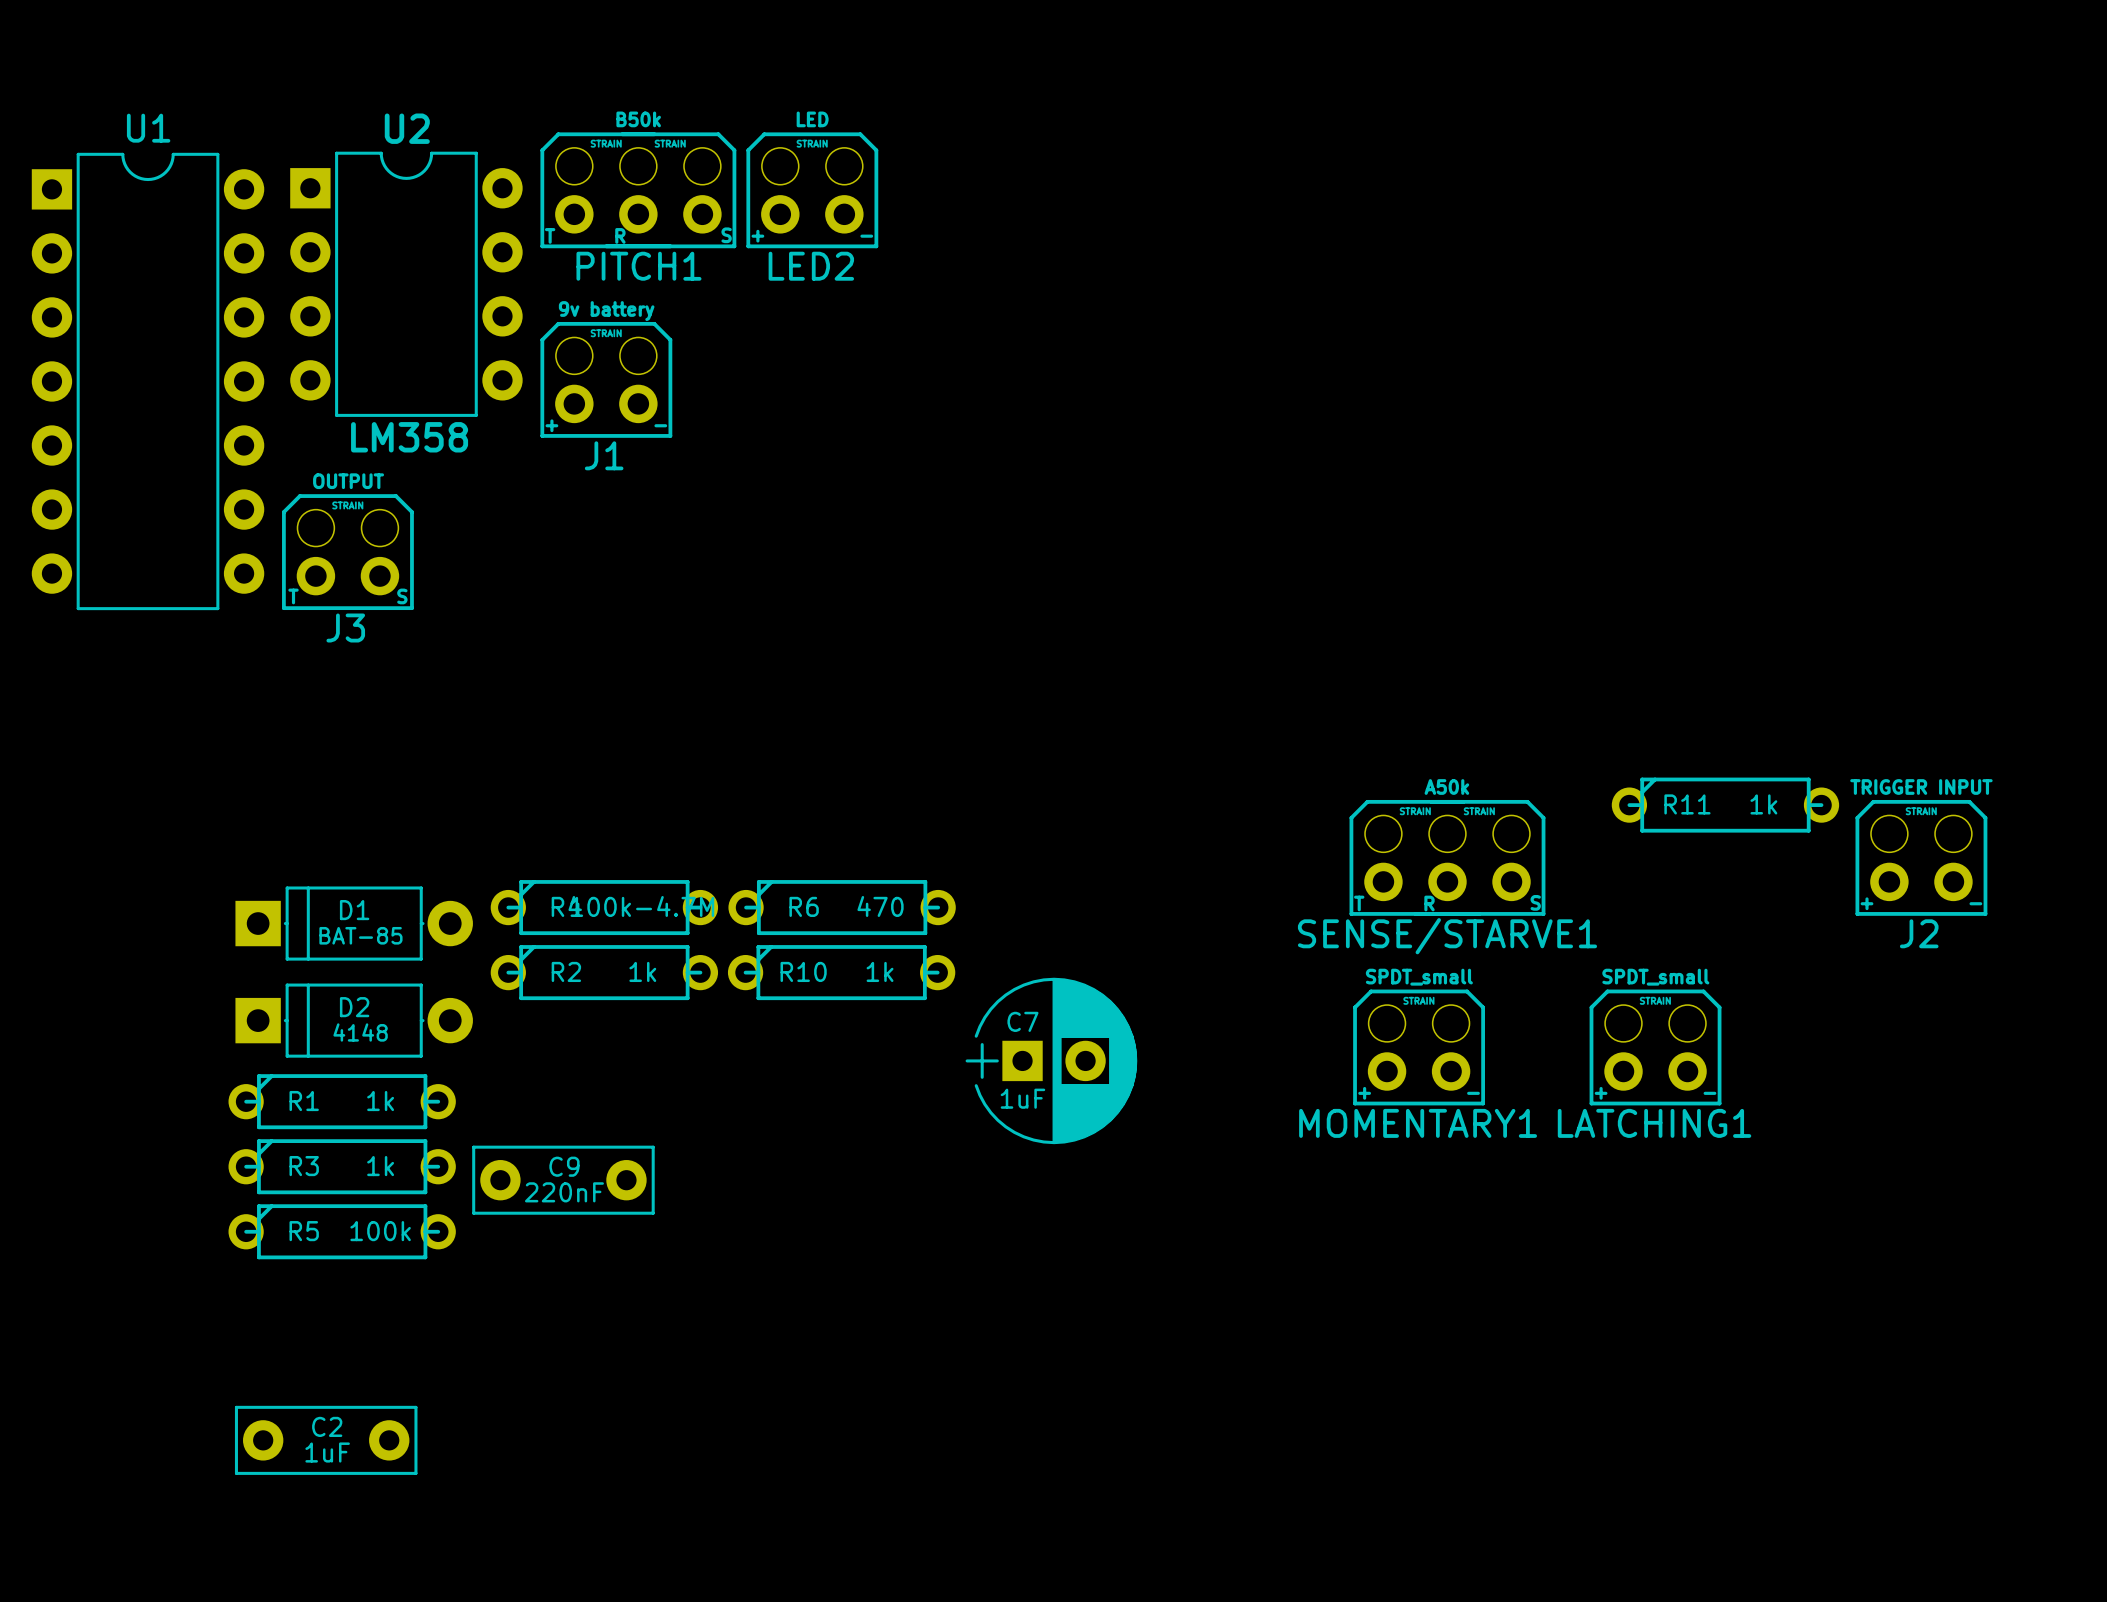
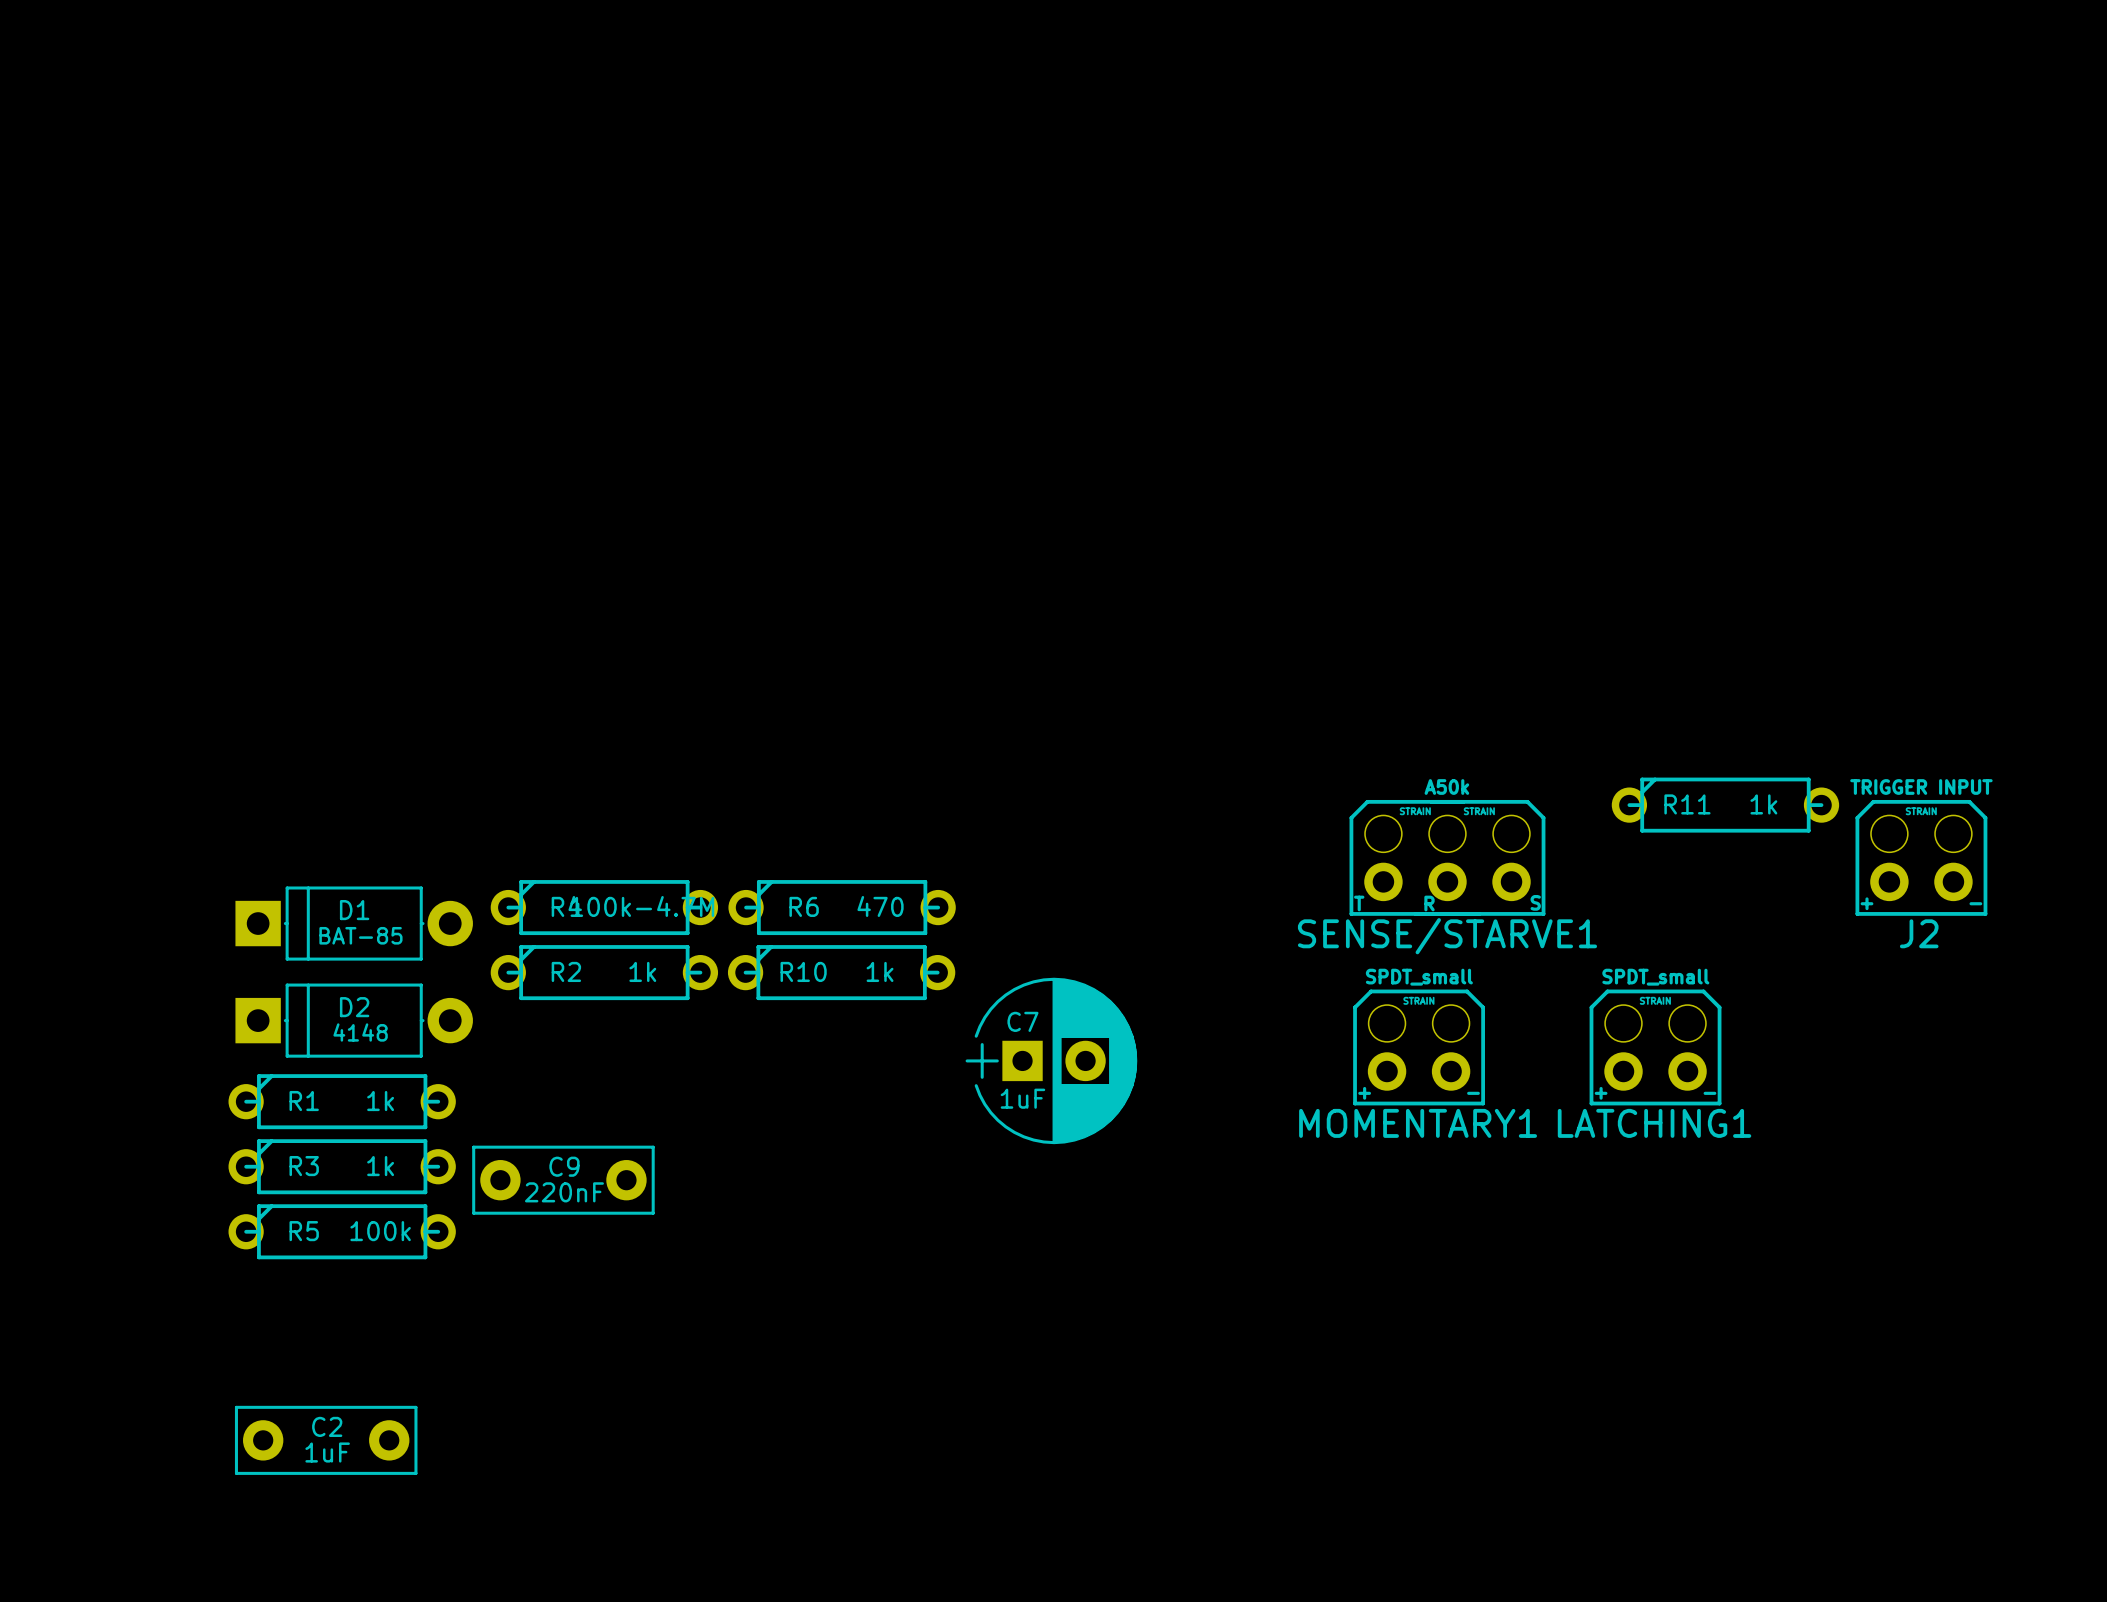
PITCH1: B50k (638, 190) -> none
LED2: LED (812, 190) -> none
U2: LM358 (406, 284) -> none
J1: 9v battery (606, 379) -> none
U1: (148, 381) -> none
J3: OUTPUT (347, 552) -> none

